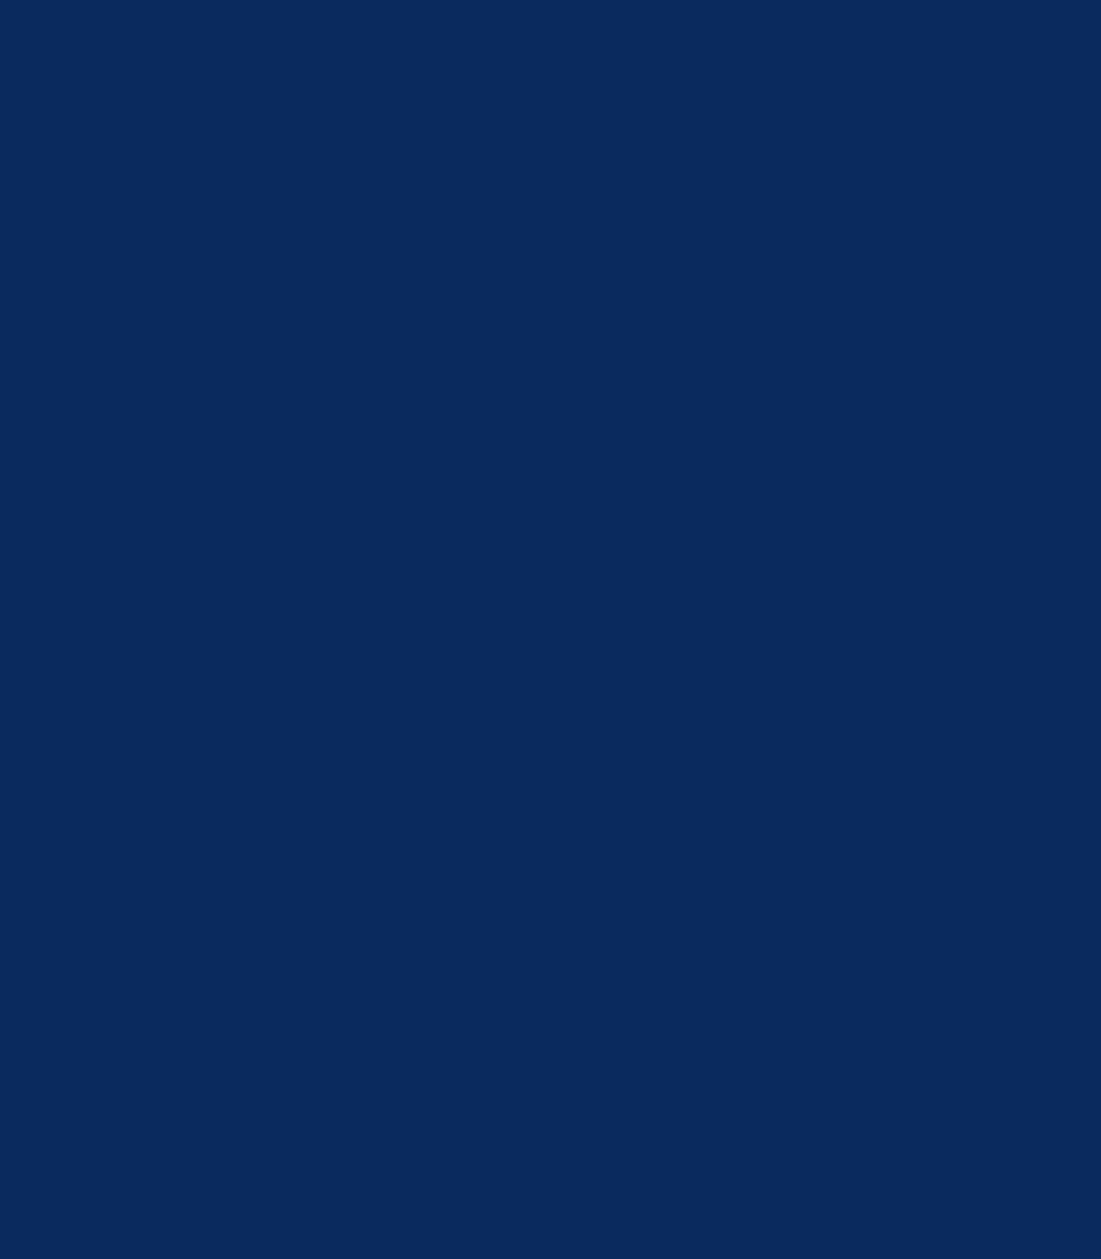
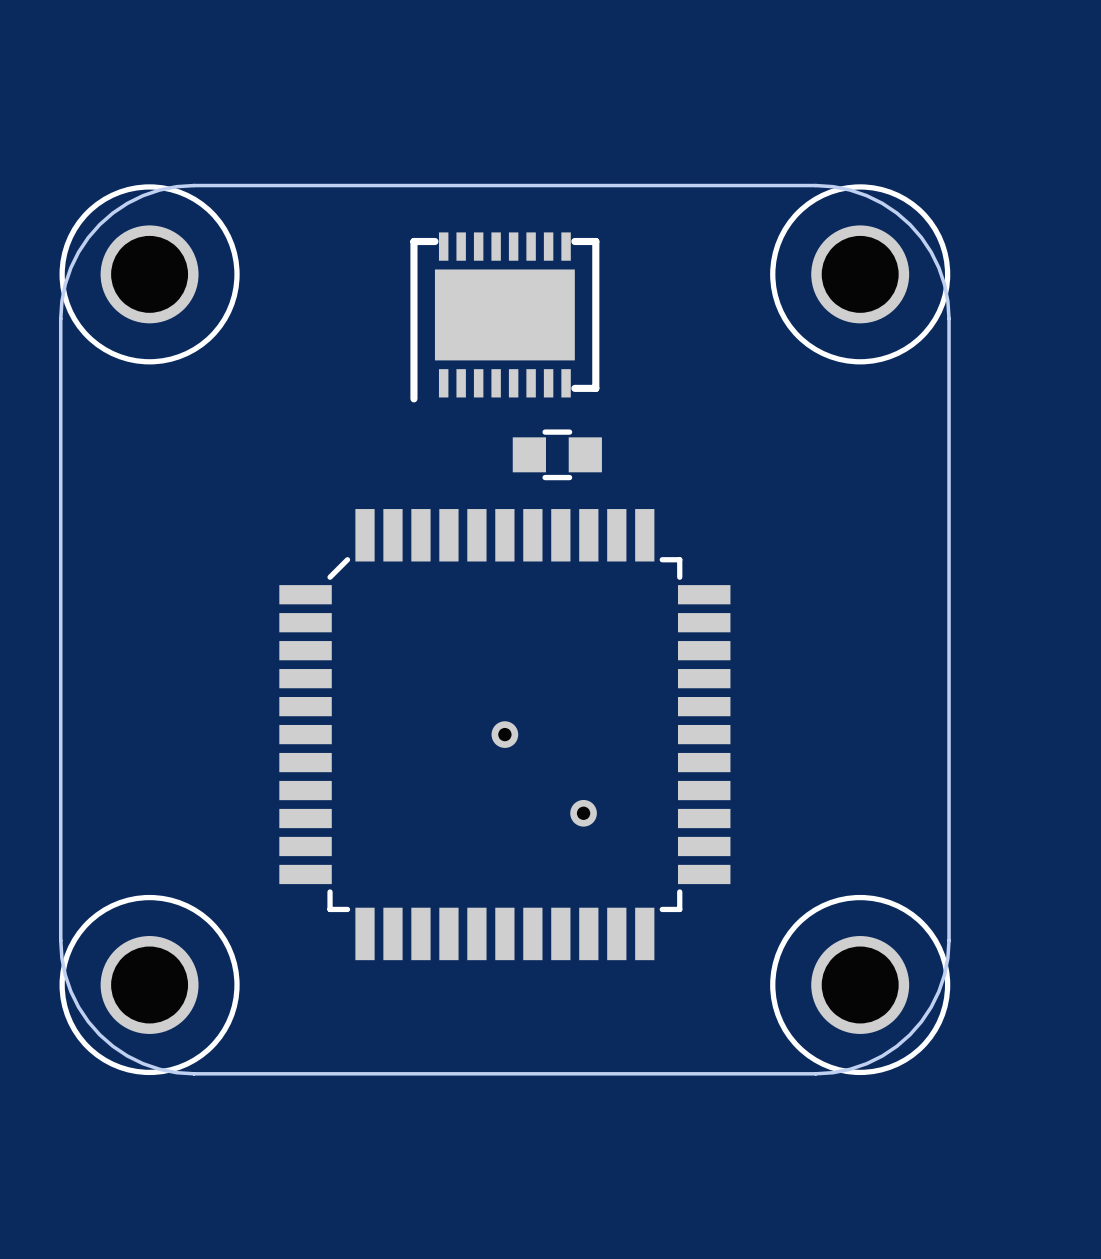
board edge: none -> (193, 185) (833, 186) (866, 195) (882, 203) (909, 224) (921, 237) (931, 252) (944, 284) (949, 318) (949, 940) (944, 975) (931, 1007) (909, 1034) (896, 1046) (882, 1055) (850, 1069) (815, 1073) (193, 1073) (159, 1069) (127, 1055) (99, 1034) (88, 1021) (78, 1007) (65, 975) (60, 940) (61, 301) (65, 284) (78, 252) (99, 224) (112, 213) (143, 195) (176, 186) (193, 185)
part: none -> (149, 274)
part: none -> (860, 274)
part: none -> (504, 317)
part: none -> (557, 454)
part: none -> (504, 734)
part: none -> (544, 773)
part: none -> (149, 984)
part: none -> (860, 984)

